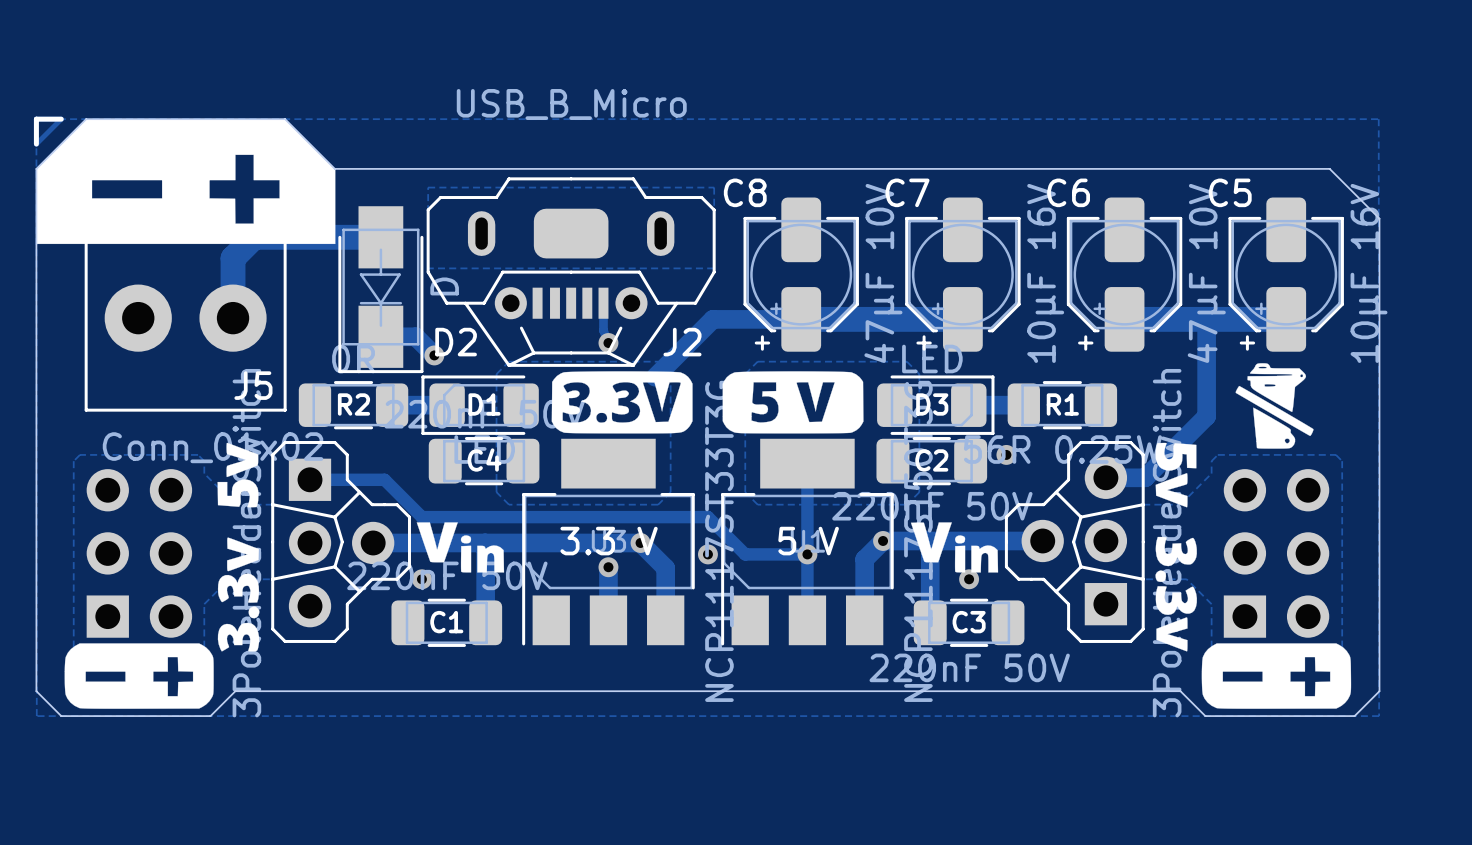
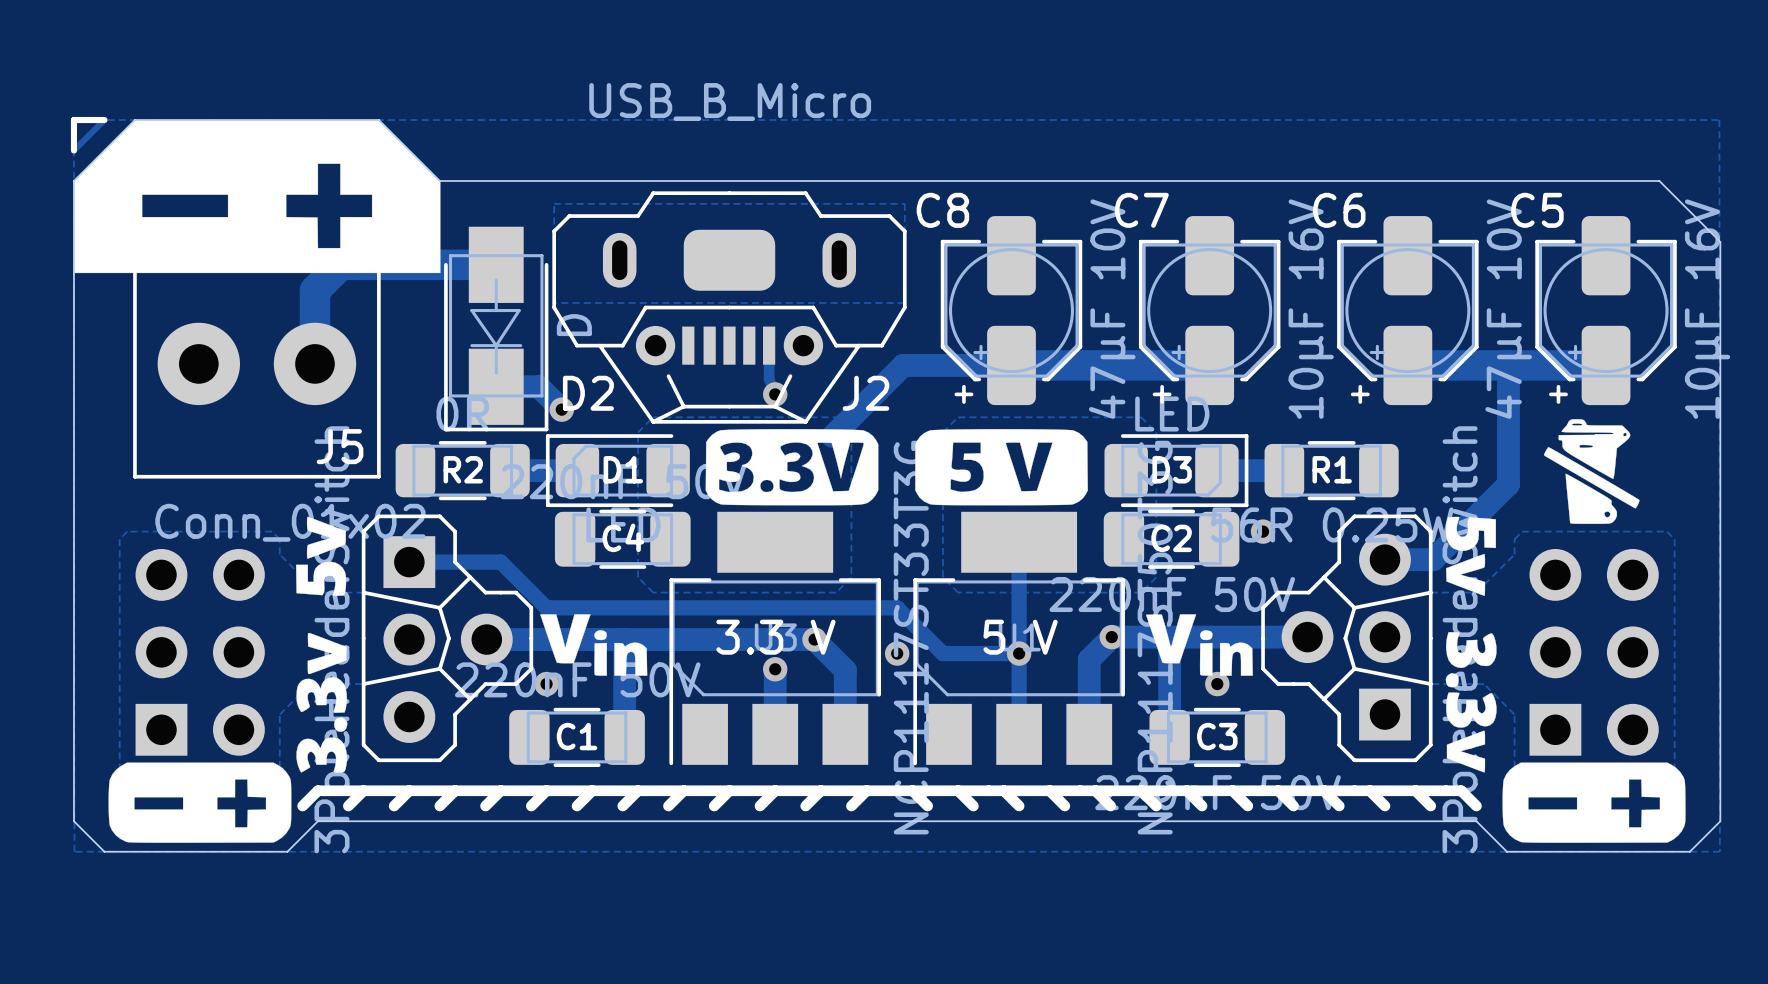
line: none -> (363, 790) (348, 806)
line: none -> (409, 790) (394, 806)
line: none -> (455, 790) (439, 806)
line: none -> (500, 790) (485, 806)
line: none -> (546, 790) (531, 806)
line: none -> (592, 790) (577, 806)
line: none -> (638, 790) (622, 806)
line: none -> (683, 790) (668, 806)
line: none -> (729, 790) (714, 806)
line: none -> (775, 790) (759, 806)
line: none -> (820, 790) (805, 806)
line: none -> (866, 790) (851, 806)
line: none -> (912, 790) (927, 806)
line: none -> (958, 790) (973, 806)
line: none -> (1003, 790) (1019, 806)
line: none -> (1049, 790) (1064, 806)
line: none -> (1095, 790) (1110, 806)
line: none -> (1141, 790) (1156, 806)
line: none -> (1186, 790) (1202, 806)
line: none -> (1232, 790) (1247, 806)
line: none -> (1278, 790) (1293, 806)
line: none -> (1324, 790) (1339, 806)
line: none -> (1369, 790) (1384, 806)
line: none -> (1415, 790) (1430, 806)
line: none -> (302, 806) (317, 790) (1461, 790) (1476, 806)

